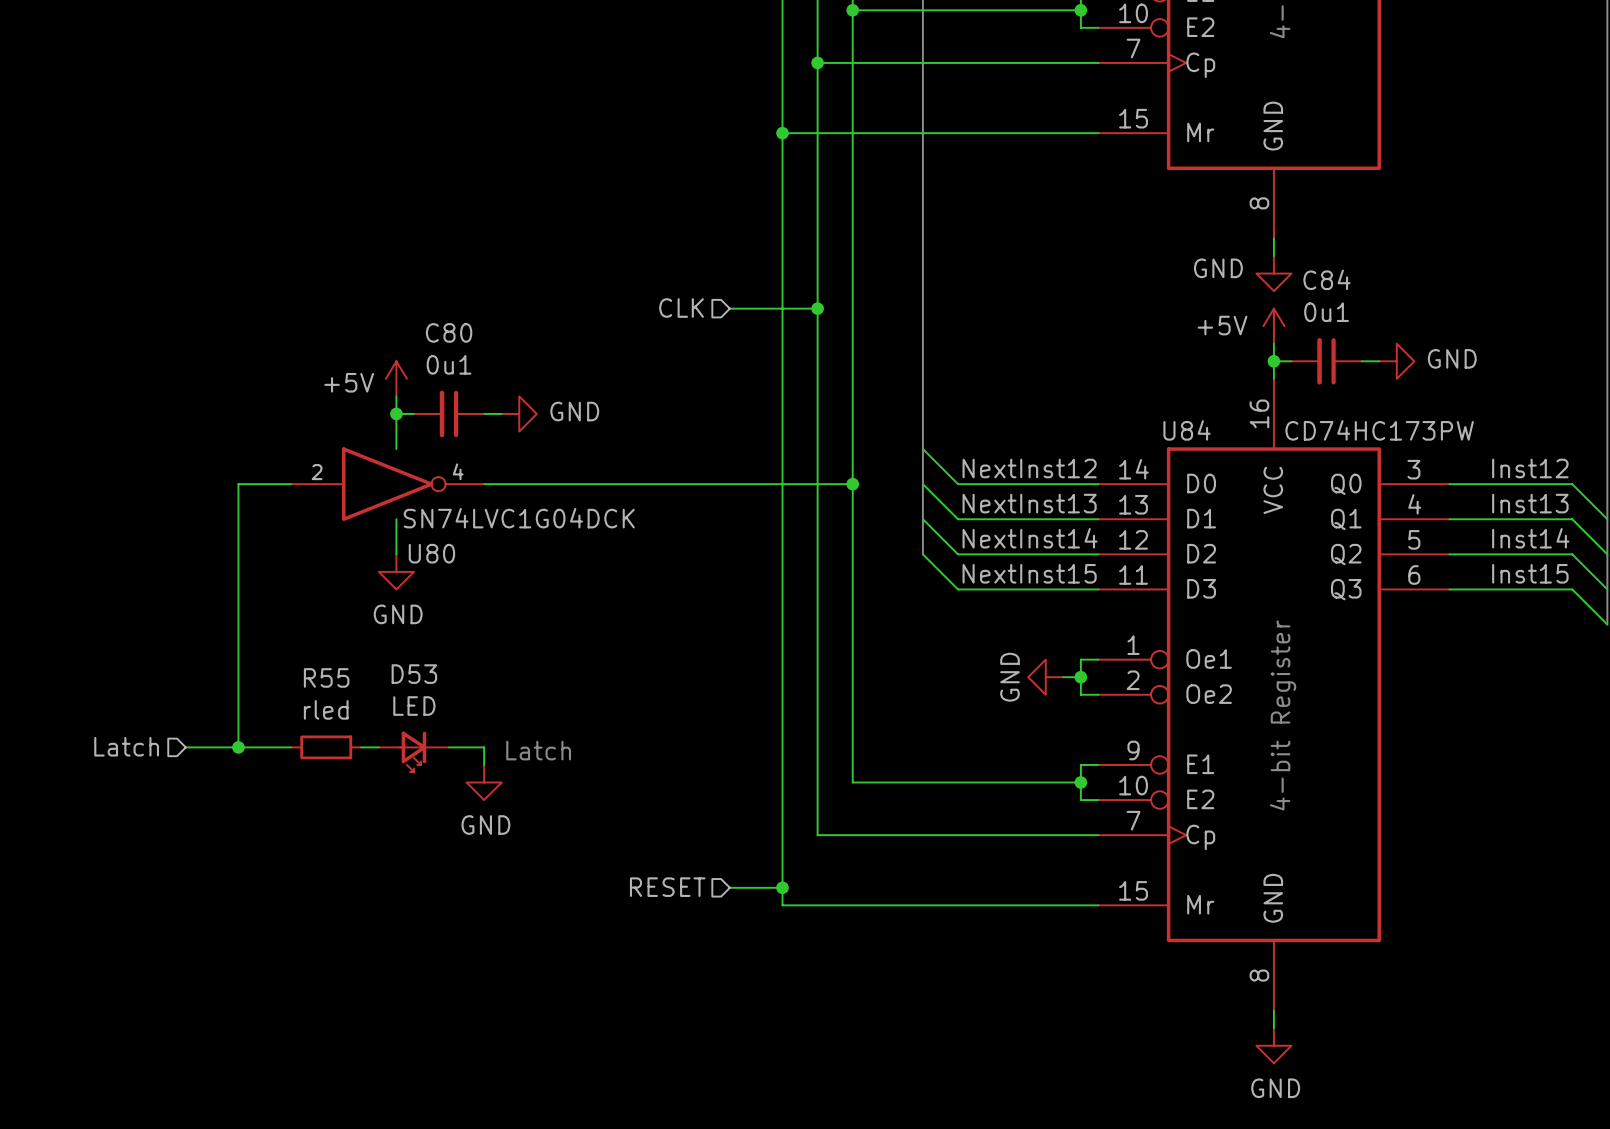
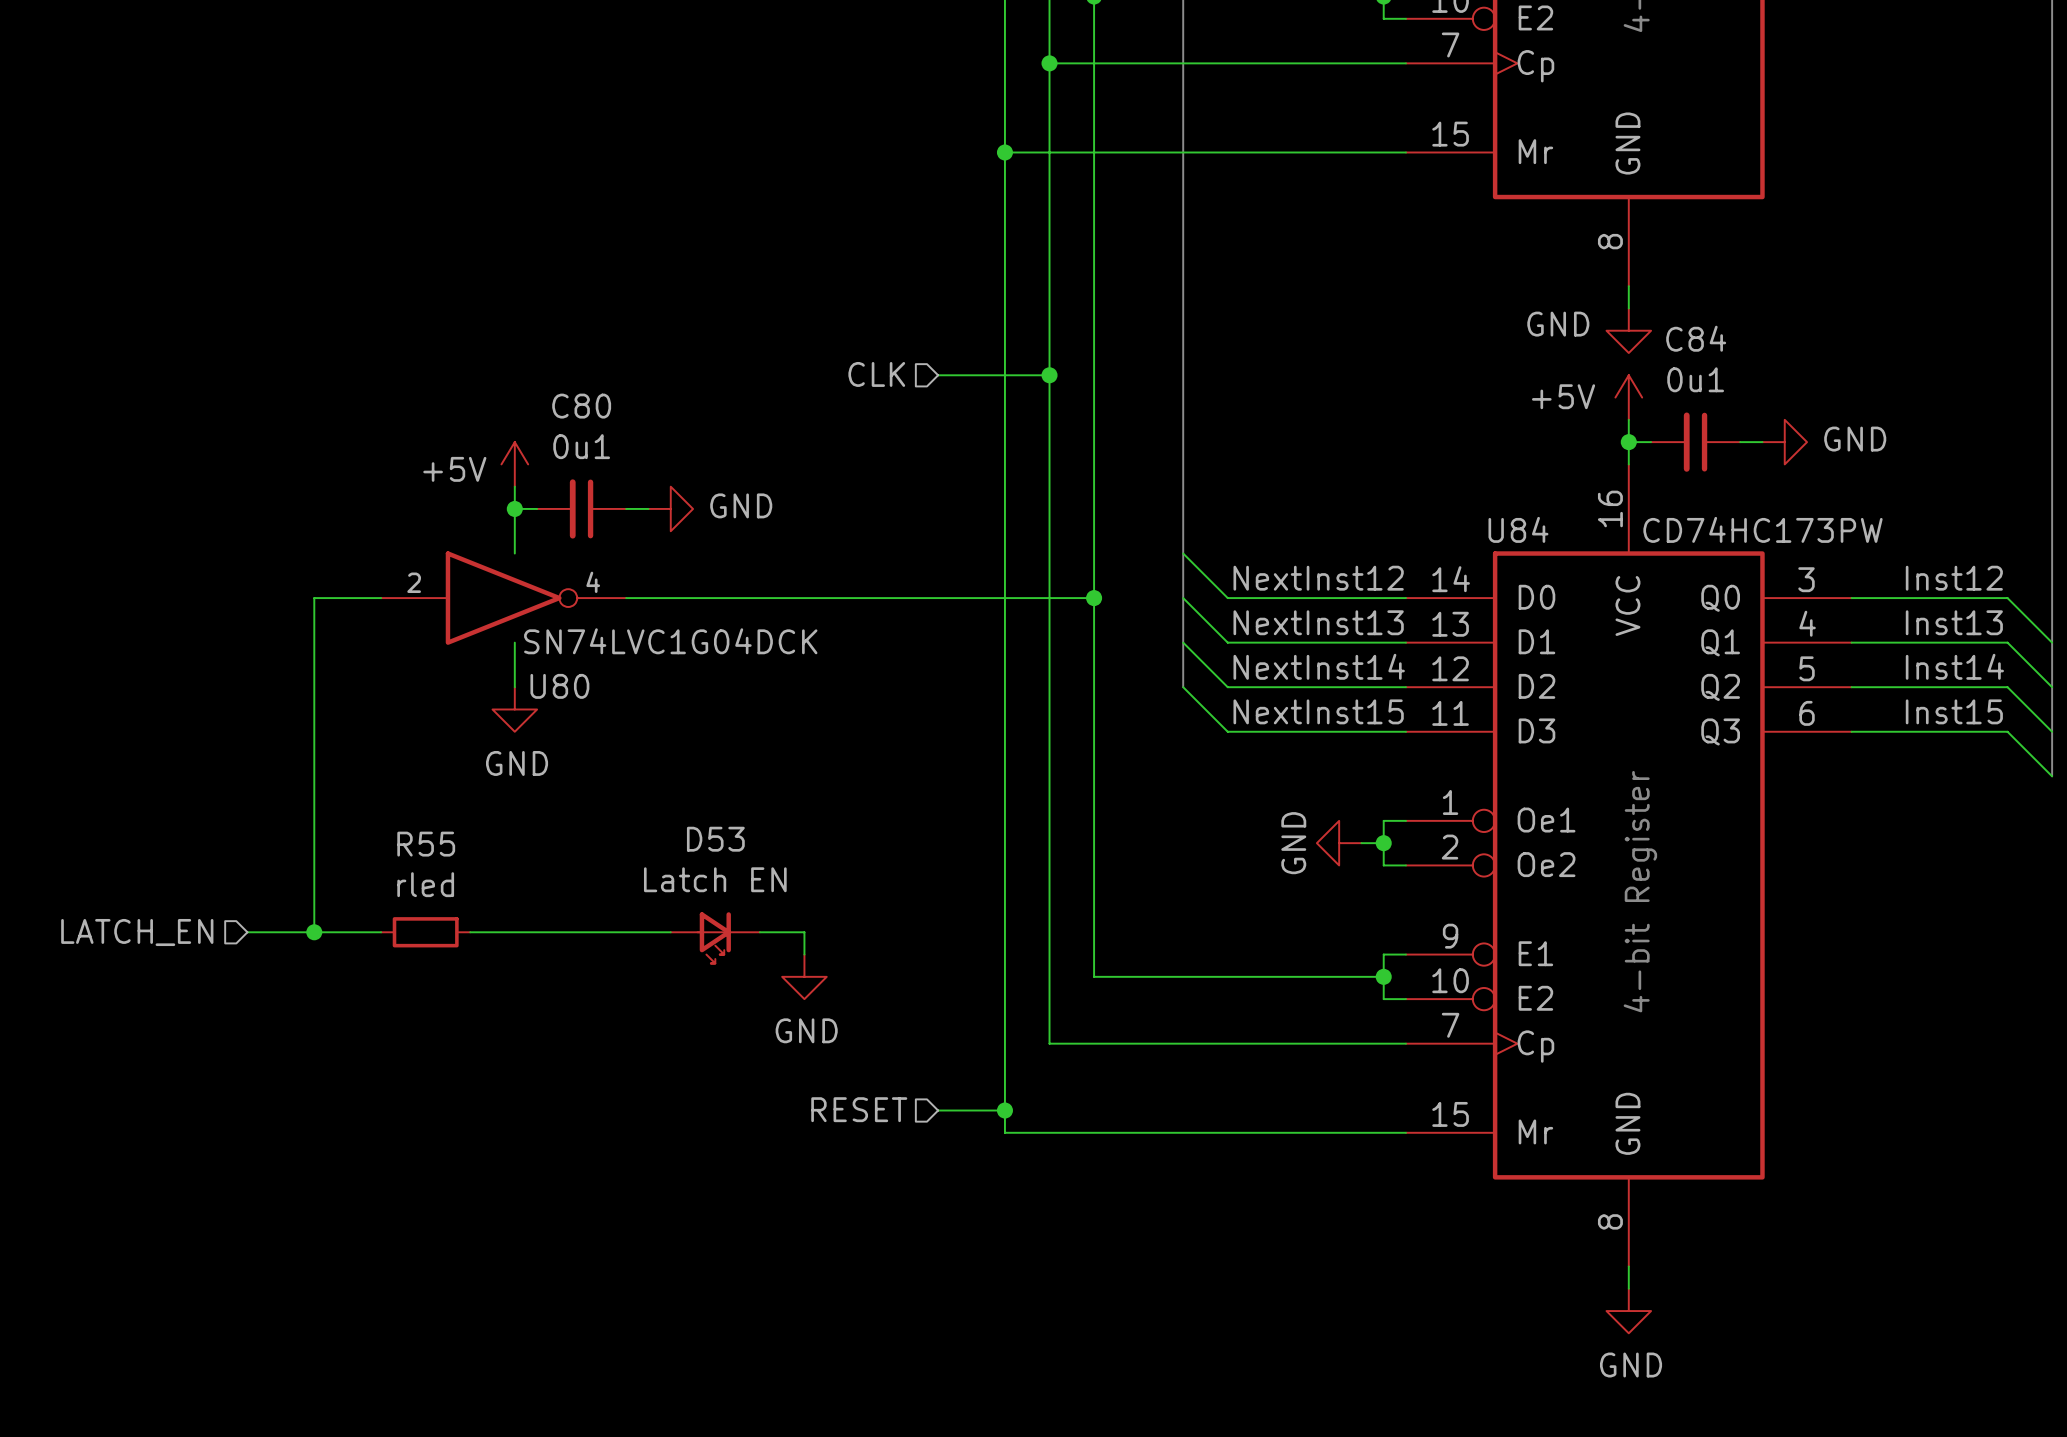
D53 value: LED (414, 706) -> Latch EN (715, 879)
hierarchical label: Latch (126, 746) -> LATCH_EN (137, 932)
wire: (484, 747) (484, 764) -> (626, 932) (670, 932)
wire: none -> (759, 932) (804, 932) (804, 954)
text: Latch (538, 750) -> none
D53 position: (413, 751) -> (715, 937)
power symbol position: GND (484, 782) -> GND (804, 976)

